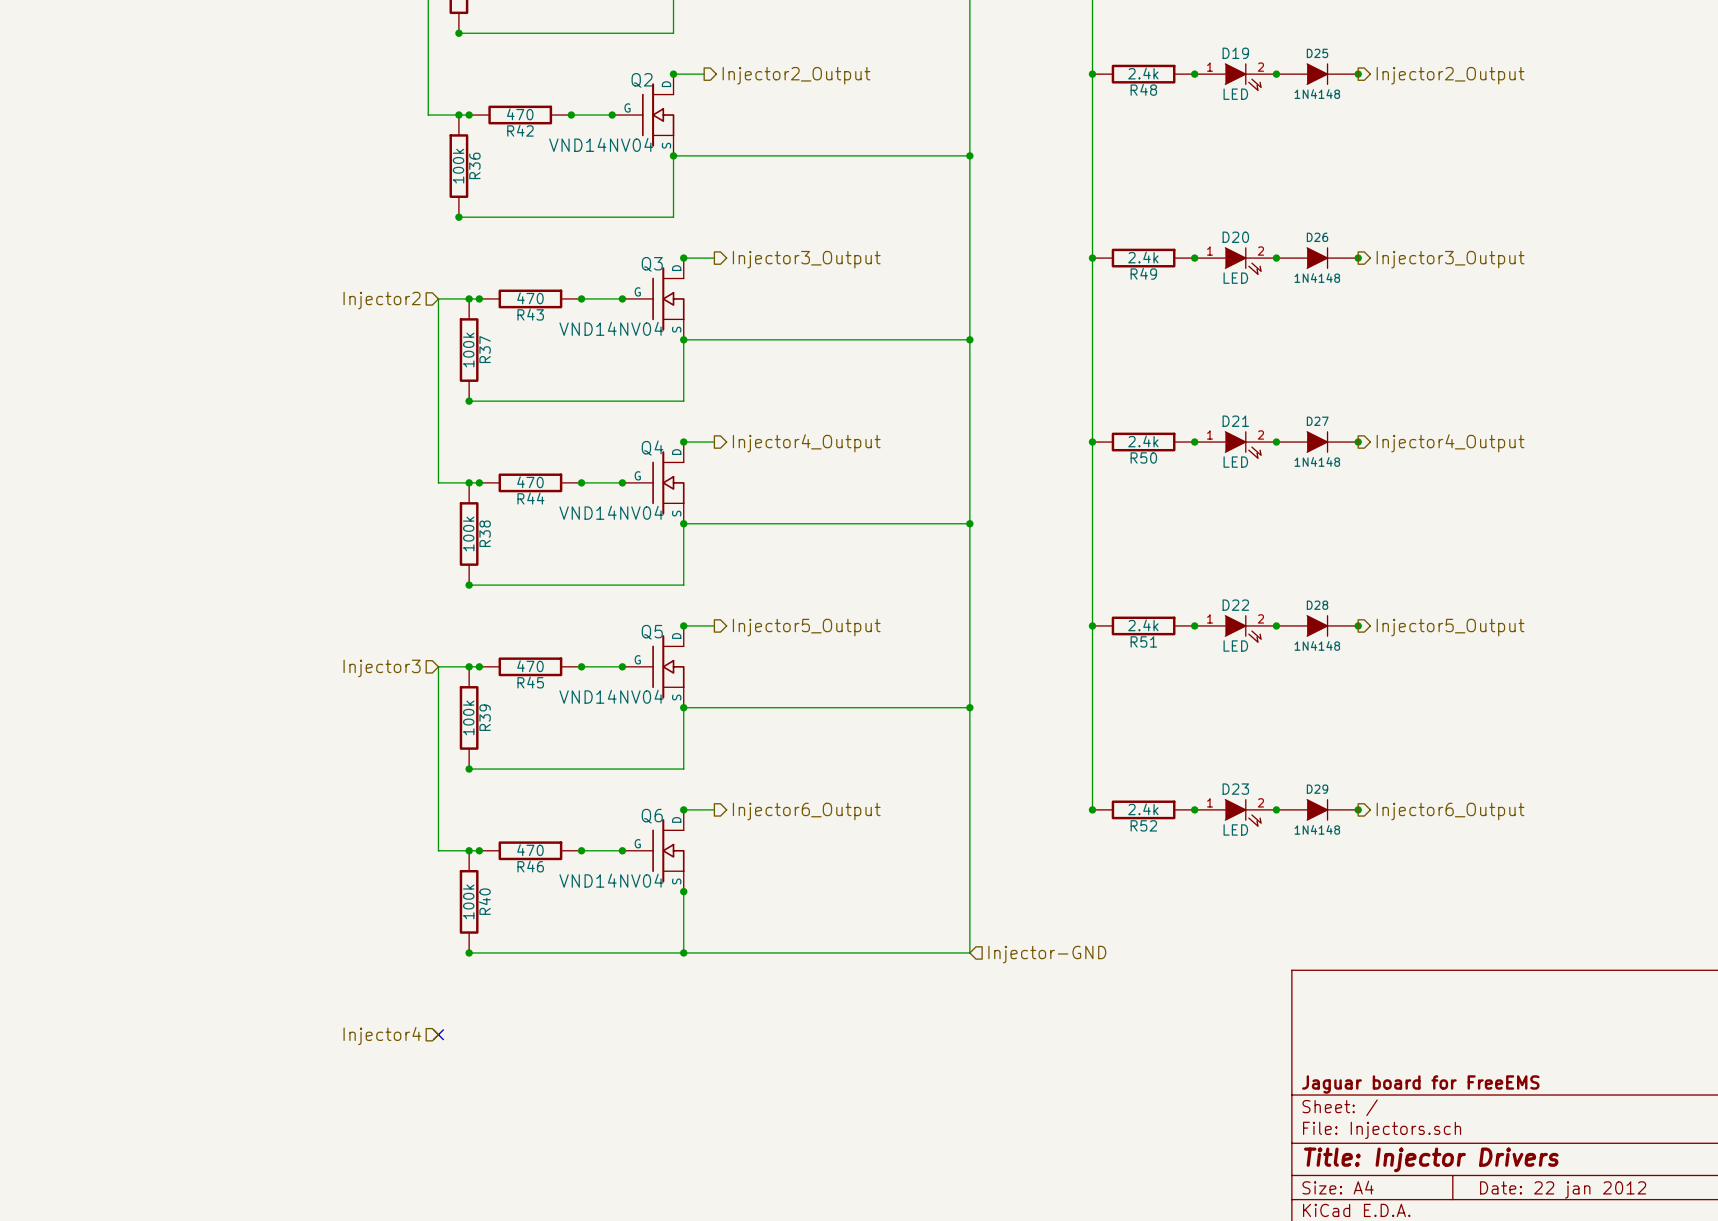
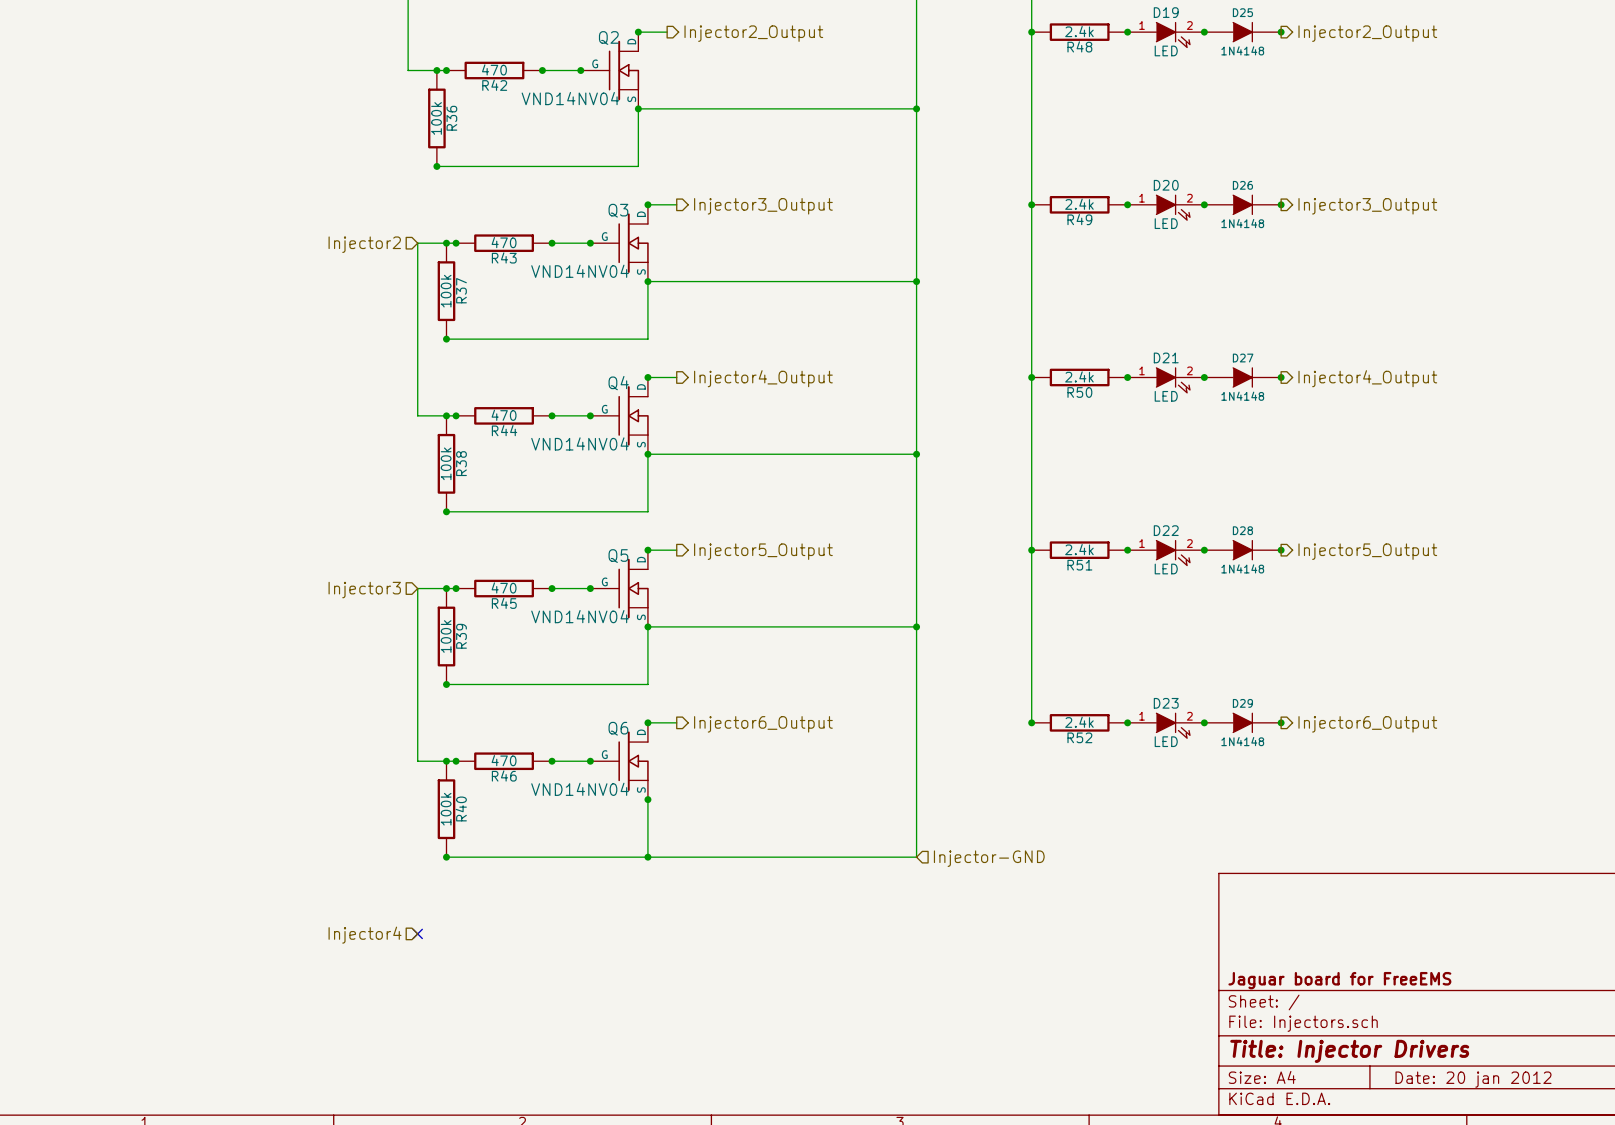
title block: Date: 22 jan 2012 (1563, 1189) -> Date: 20 jan 2012 (1473, 1079)

